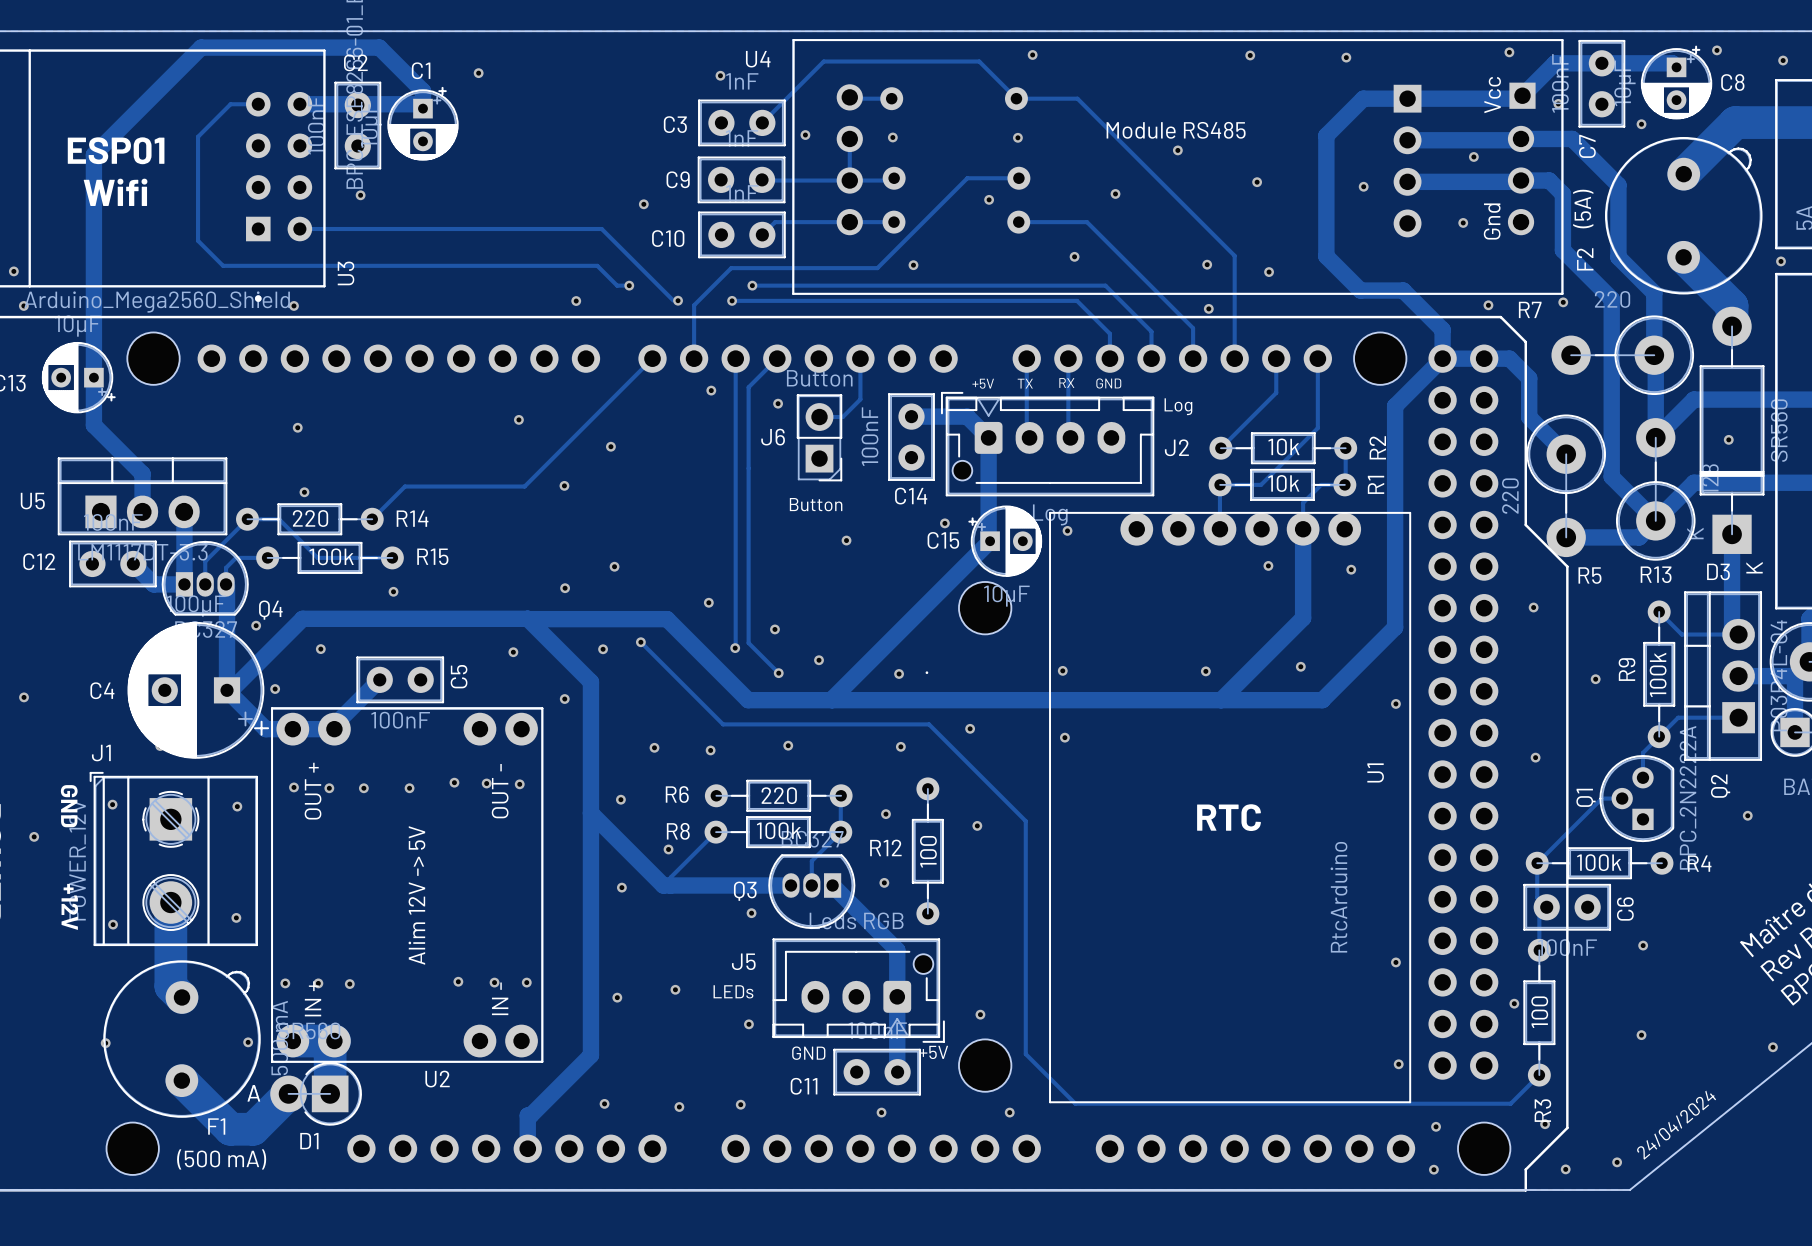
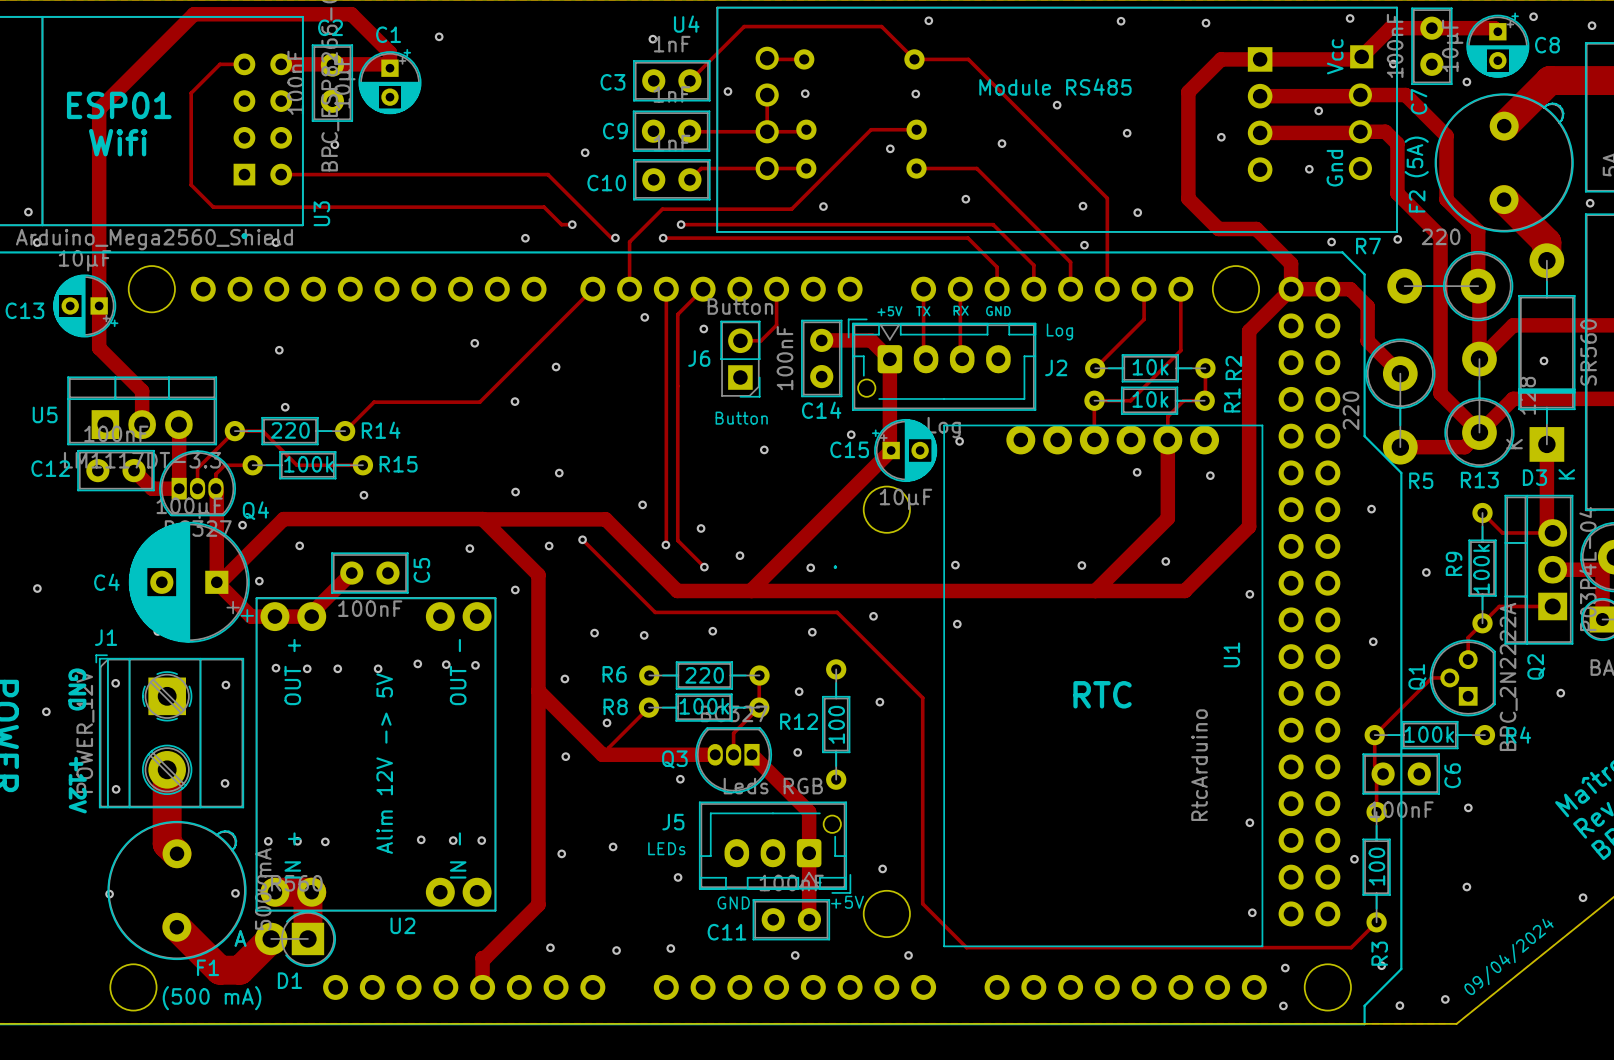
text: 24/04/2024 (1676, 1125) -> 09/04/2024 (1509, 956)

